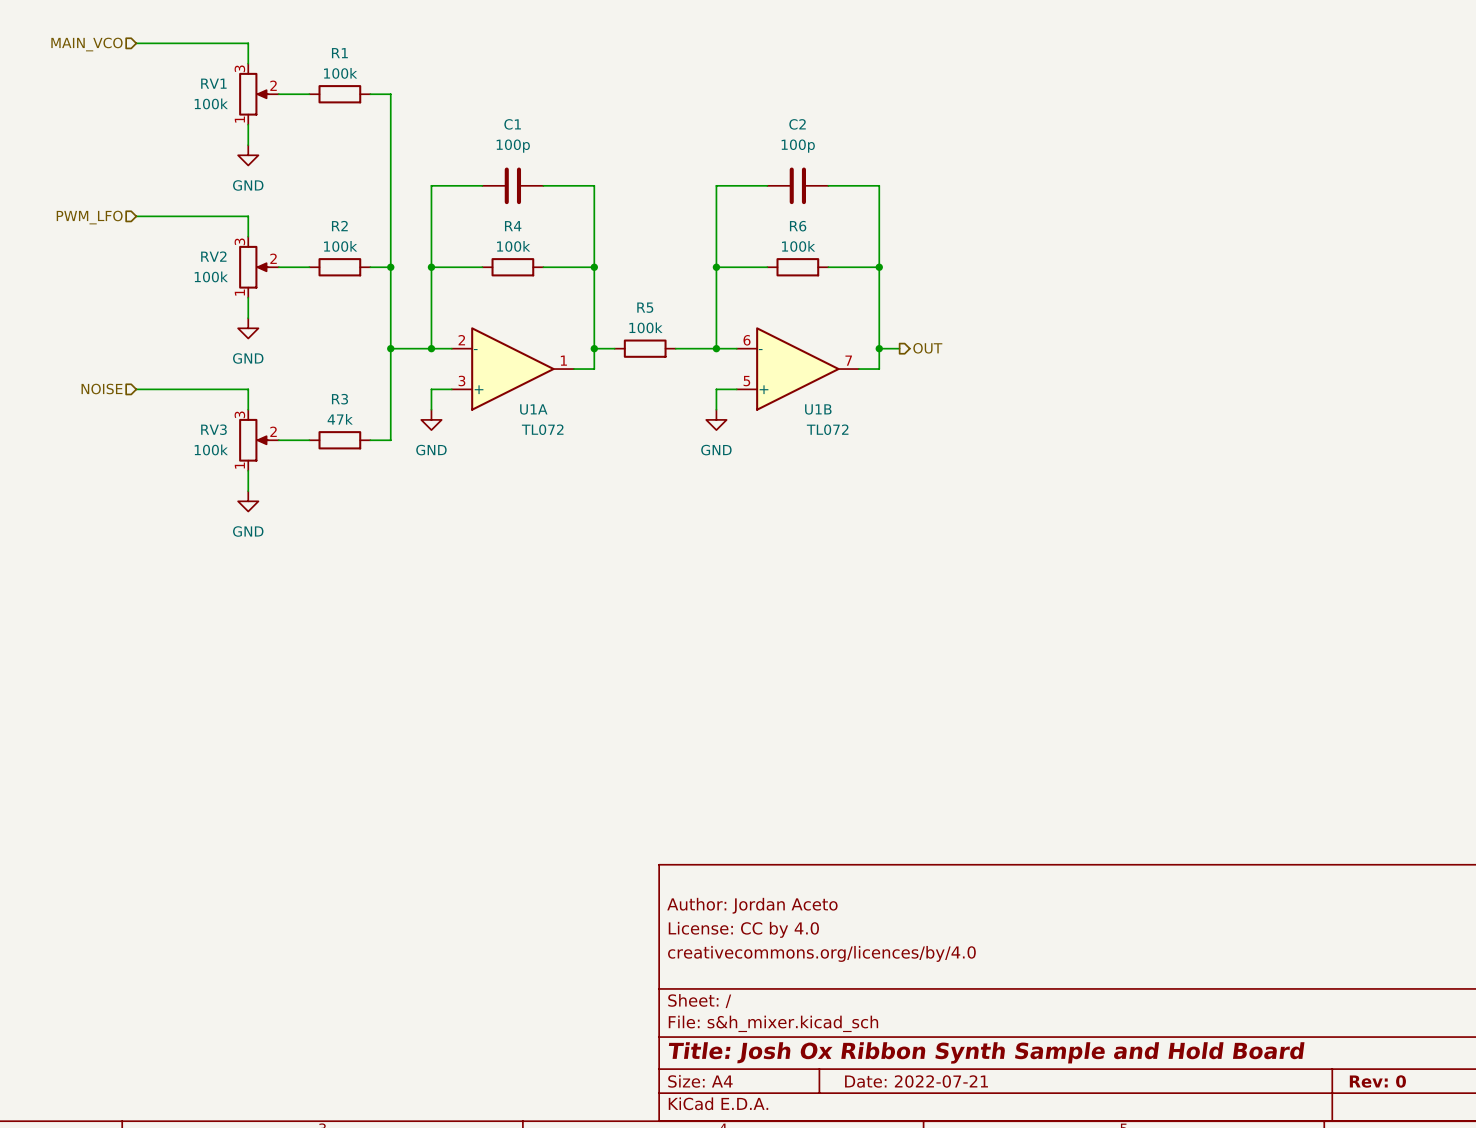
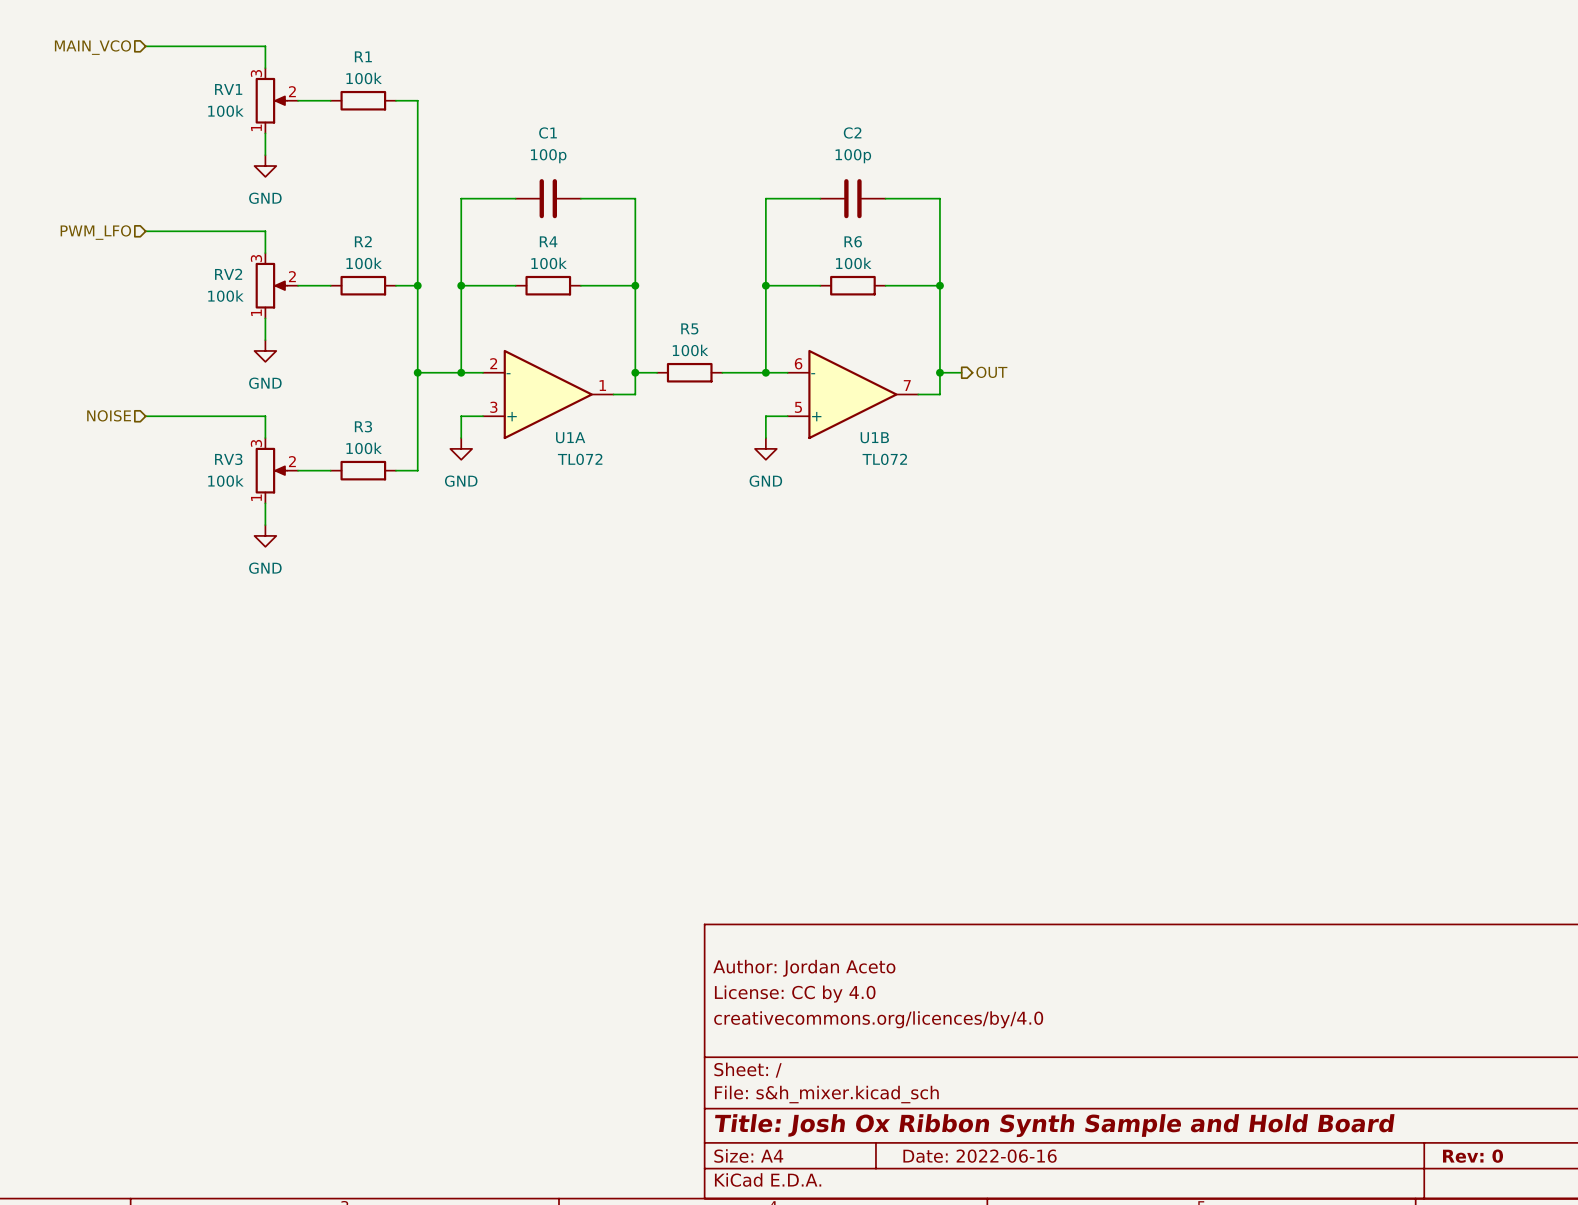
R3 value: 47k (340, 419) -> 100k (364, 448)
title block: Date: 2022-07-21 (916, 1081) -> Date: 2022-06-16 (980, 1156)

